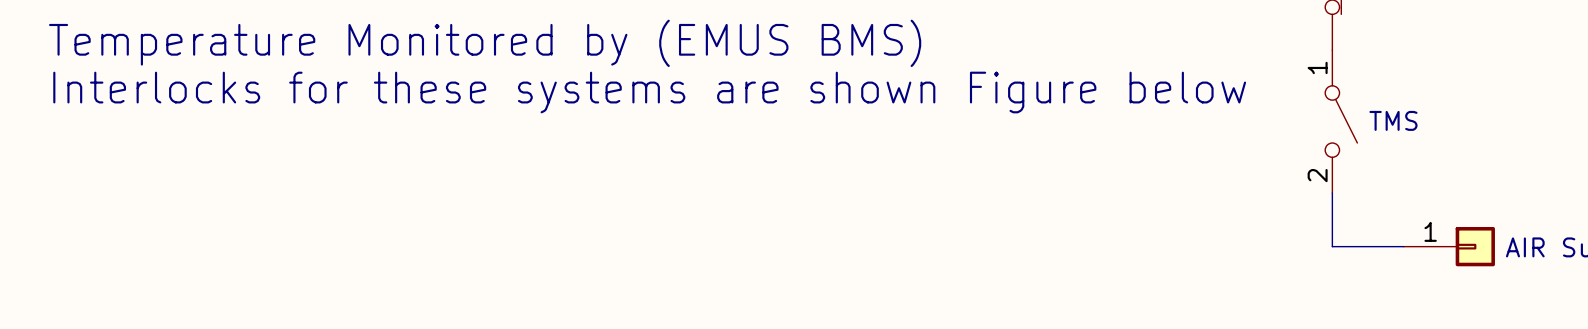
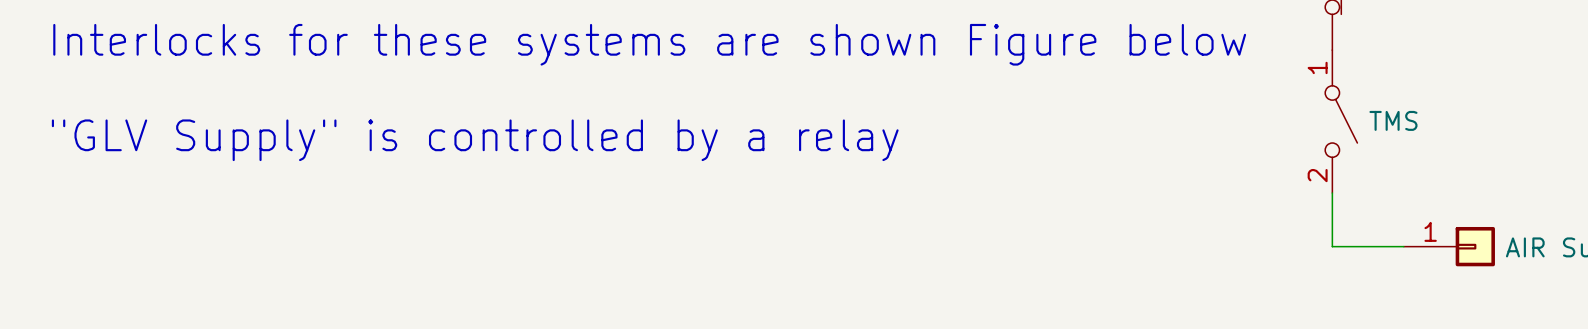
text: Temperature Monitored by (EMUS BMS) (485, 43) -> Interlocks for these systems are shown Figure below (649, 44)
text: Interlocks for these systems are shown Figure below (649, 92) -> none
text: none -> "GLV Supply" is controlled by a relay (475, 140)

